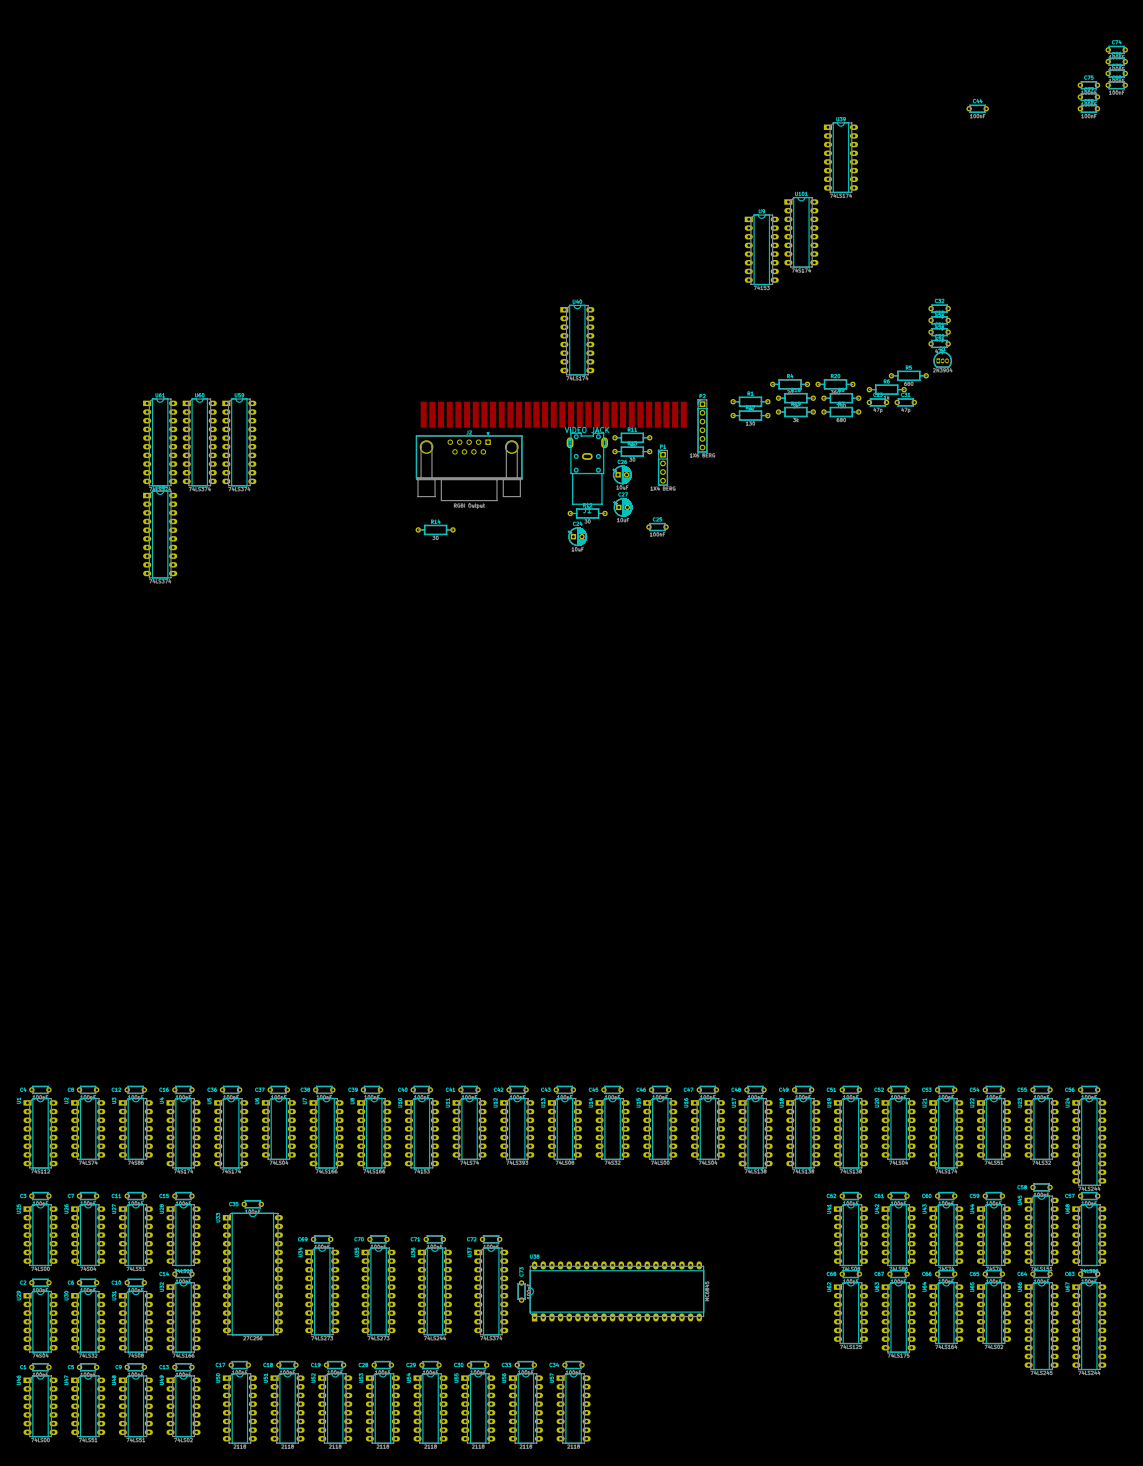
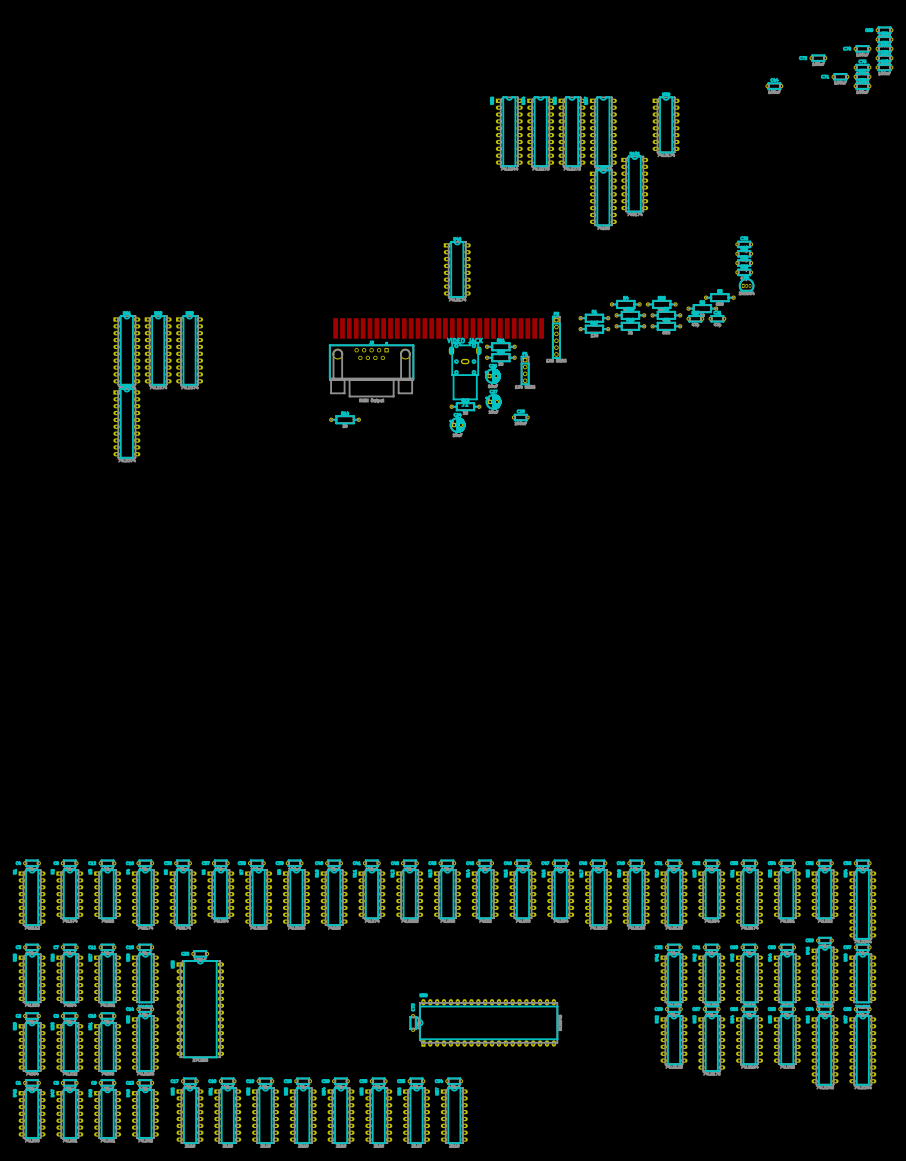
part position: (322, 1239) -> (884, 30)
part position: (378, 1239) -> (862, 48)
part position: (434, 1239) -> (840, 76)
part position: (491, 1239) -> (818, 58)
part position: (322, 1291) -> (540, 131)
part position: (378, 1291) -> (572, 131)
part position: (434, 1291) -> (509, 131)
part position: (491, 1291) -> (603, 131)

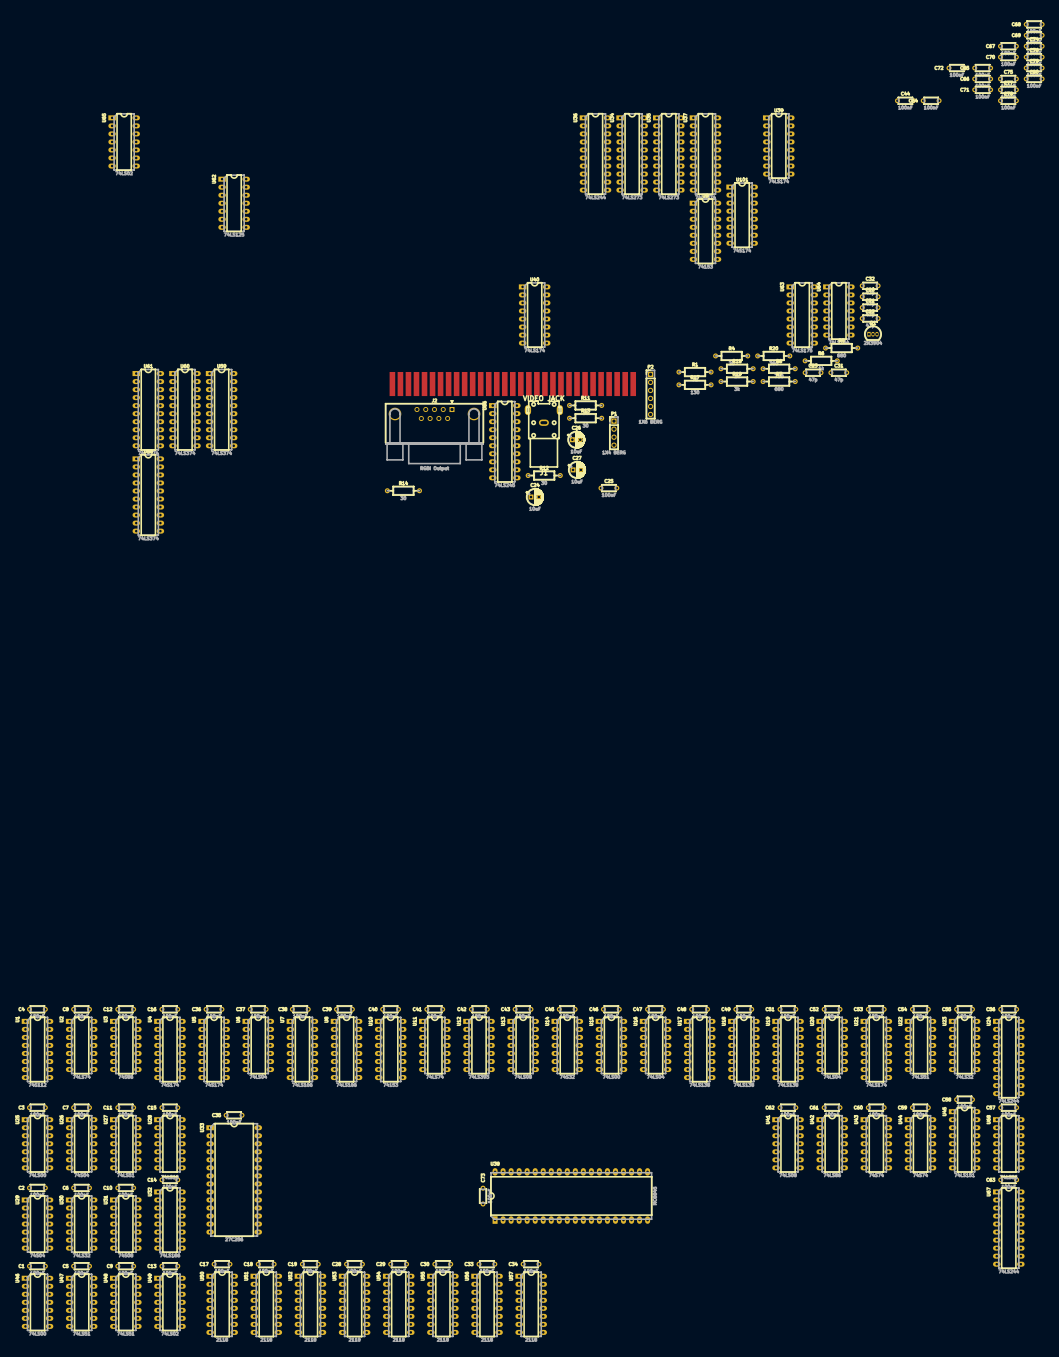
part position: (673, 1009) -> (1034, 24)
part position: (711, 1009) -> (1008, 46)
part position: (749, 1009) -> (982, 78)
part position: (787, 1009) -> (982, 68)
part position: (824, 1009) -> (931, 100)
part position: (674, 1040) -> (234, 203)
part position: (749, 1040) -> (838, 310)
part position: (787, 1040) -> (124, 141)
part position: (711, 1043) -> (802, 314)
part position: (825, 1050) -> (504, 441)

